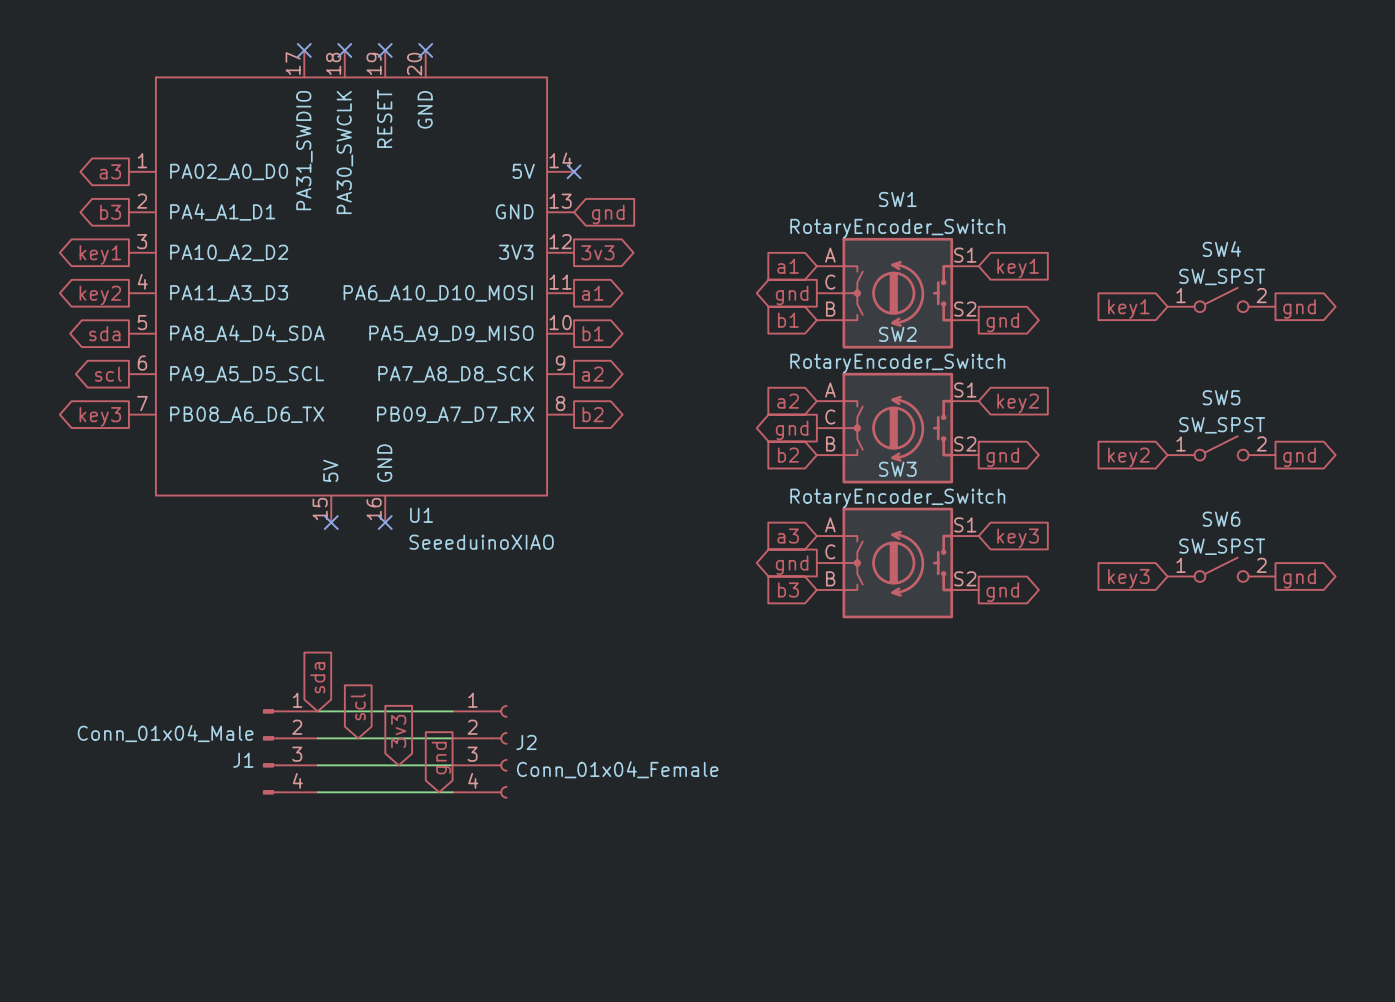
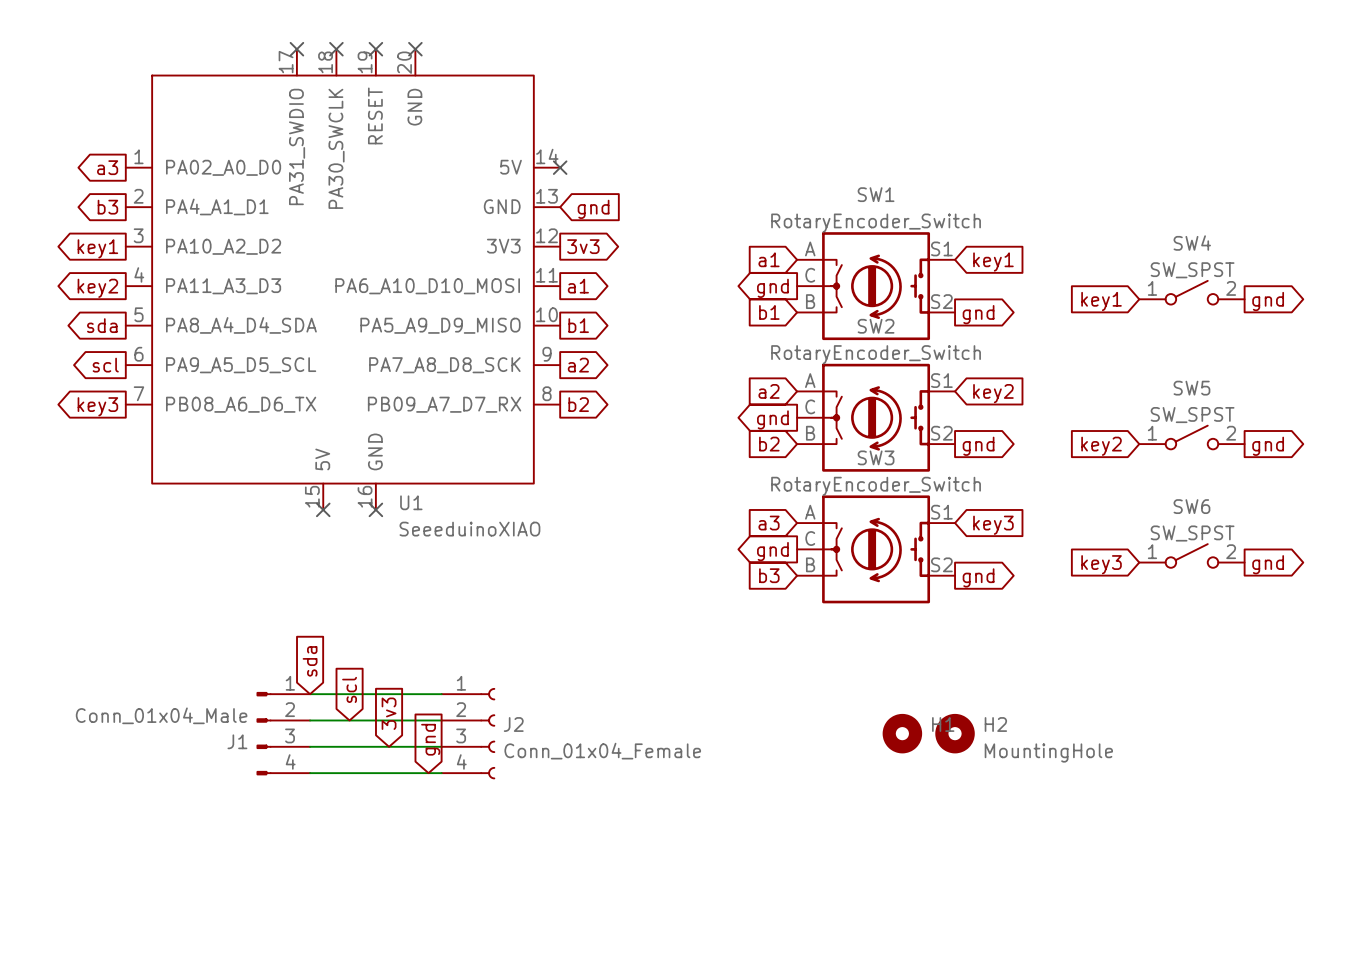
H1: none -> (902, 733)
H2: none -> MountingHole (955, 733)

